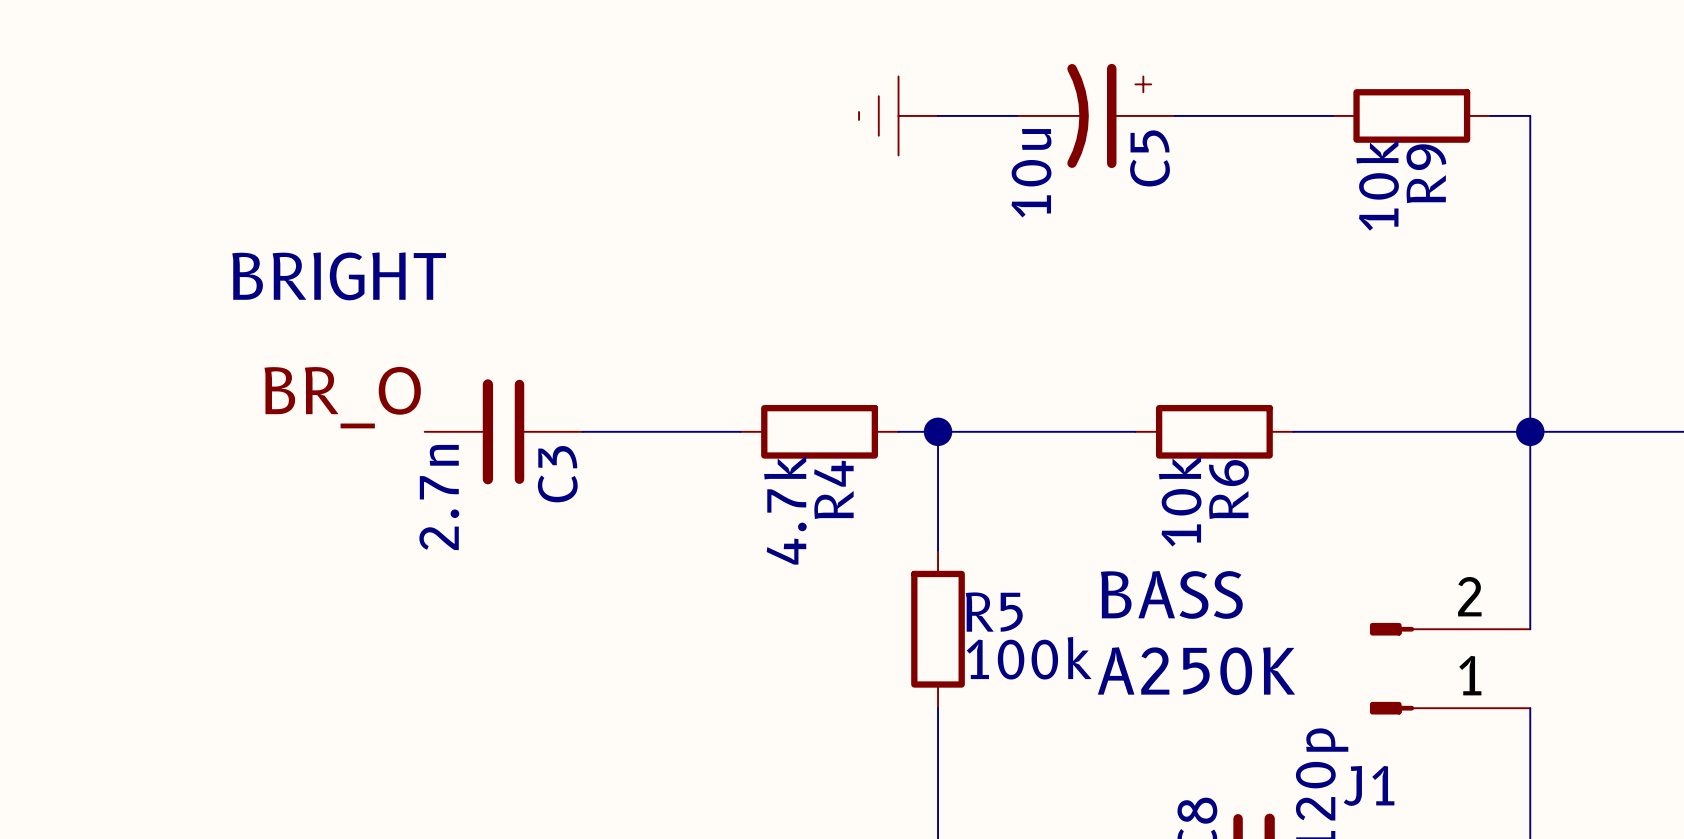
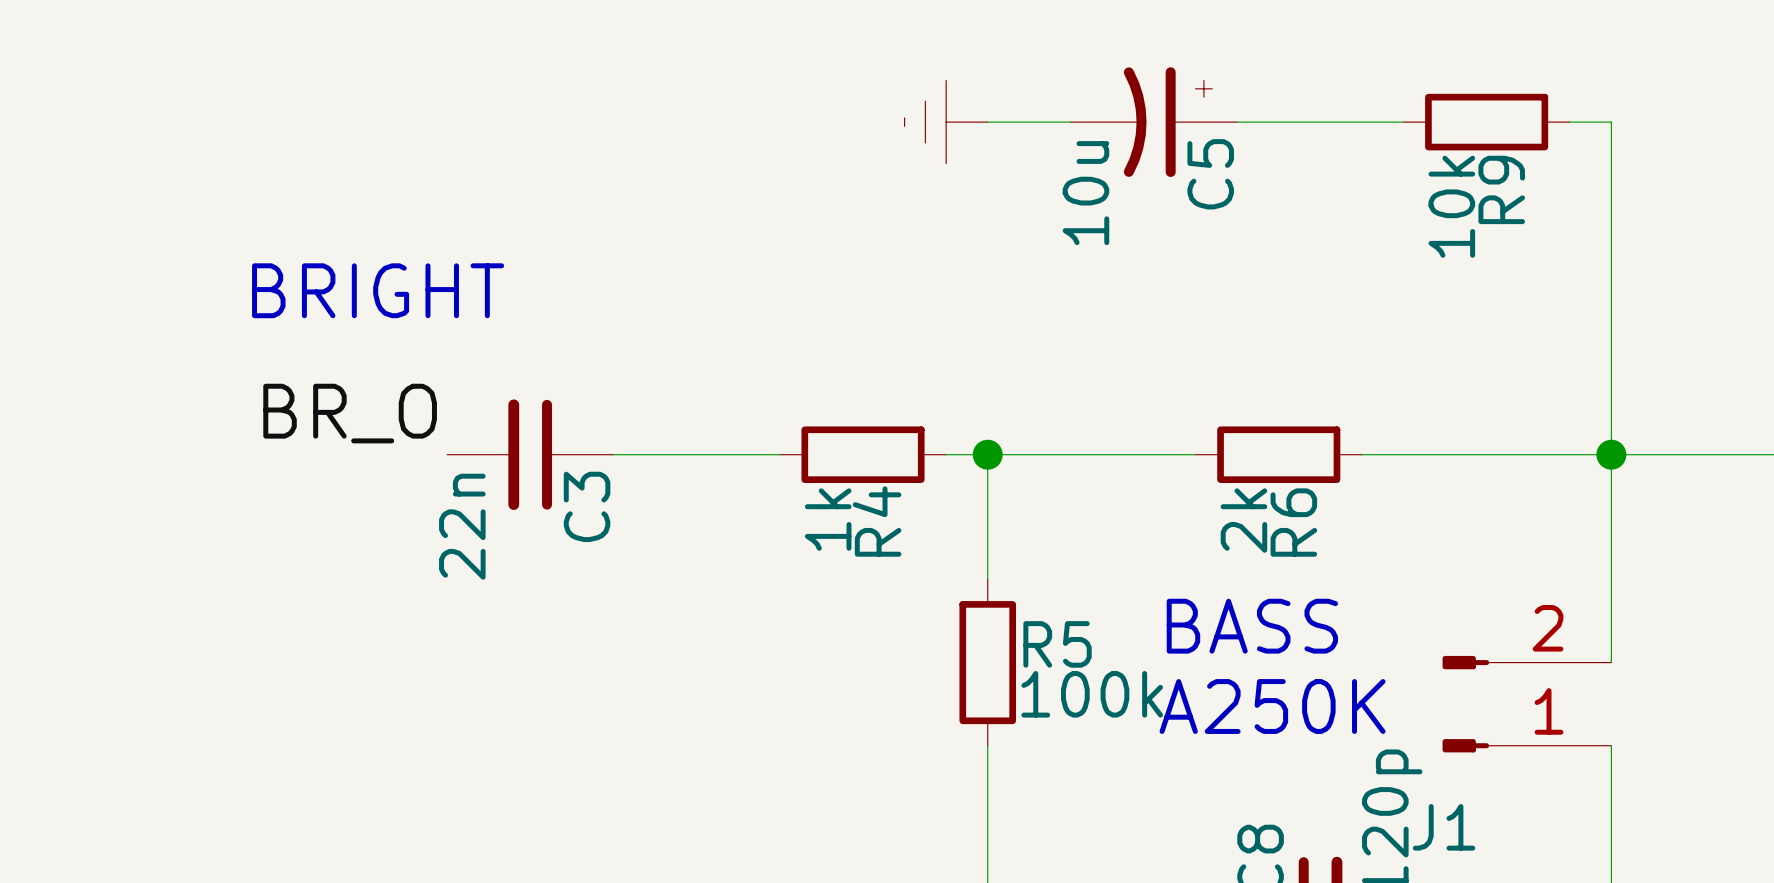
C3 value: 2.7n (439, 497) -> 22n (462, 526)
R6 value: 10k (1180, 501) -> 2k (1243, 520)
R4 value: 4.7k (785, 510) -> 1k (828, 519)

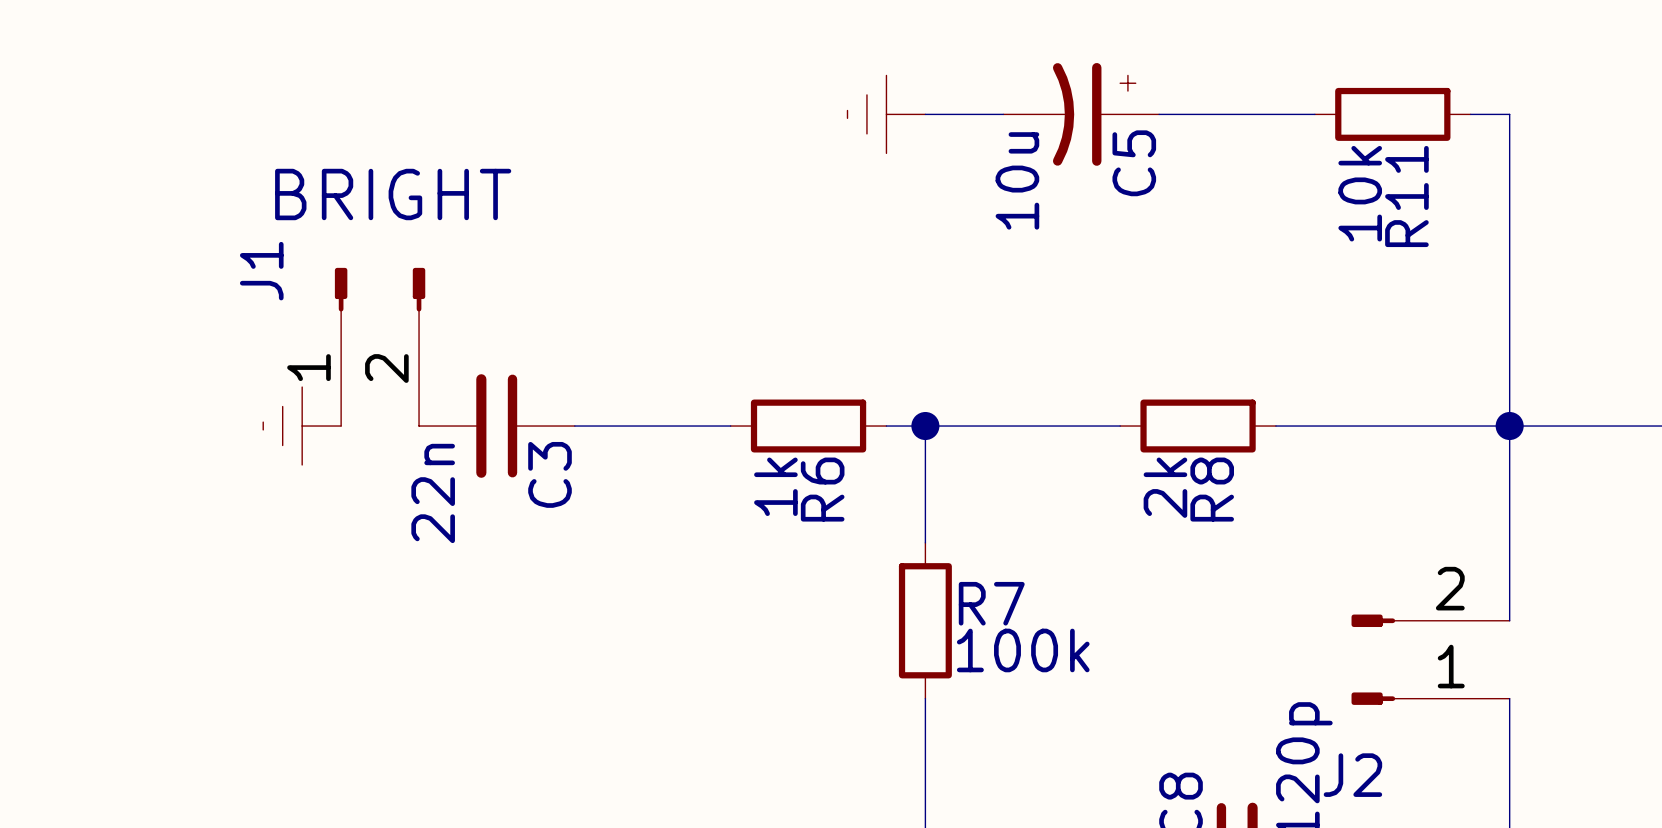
R9 name: R9 (1501, 189) -> R11 (1406, 196)
text position: BRIGHT (378, 290) -> BRIGHT (393, 194)
J1: none -> (380, 346)
label: BR_O (350, 413) -> none
power symbol: none -> (302, 426)
R4 name: R4 (877, 521) -> R6 (822, 489)
R6 name: R6 (1293, 522) -> R8 (1212, 489)
text: BASS (1252, 626) -> none
R5 name: R5 (1057, 644) -> R7 (991, 603)
text: A250K (1272, 706) -> none
J1 name: J1 (1444, 827) -> J2 (1352, 775)

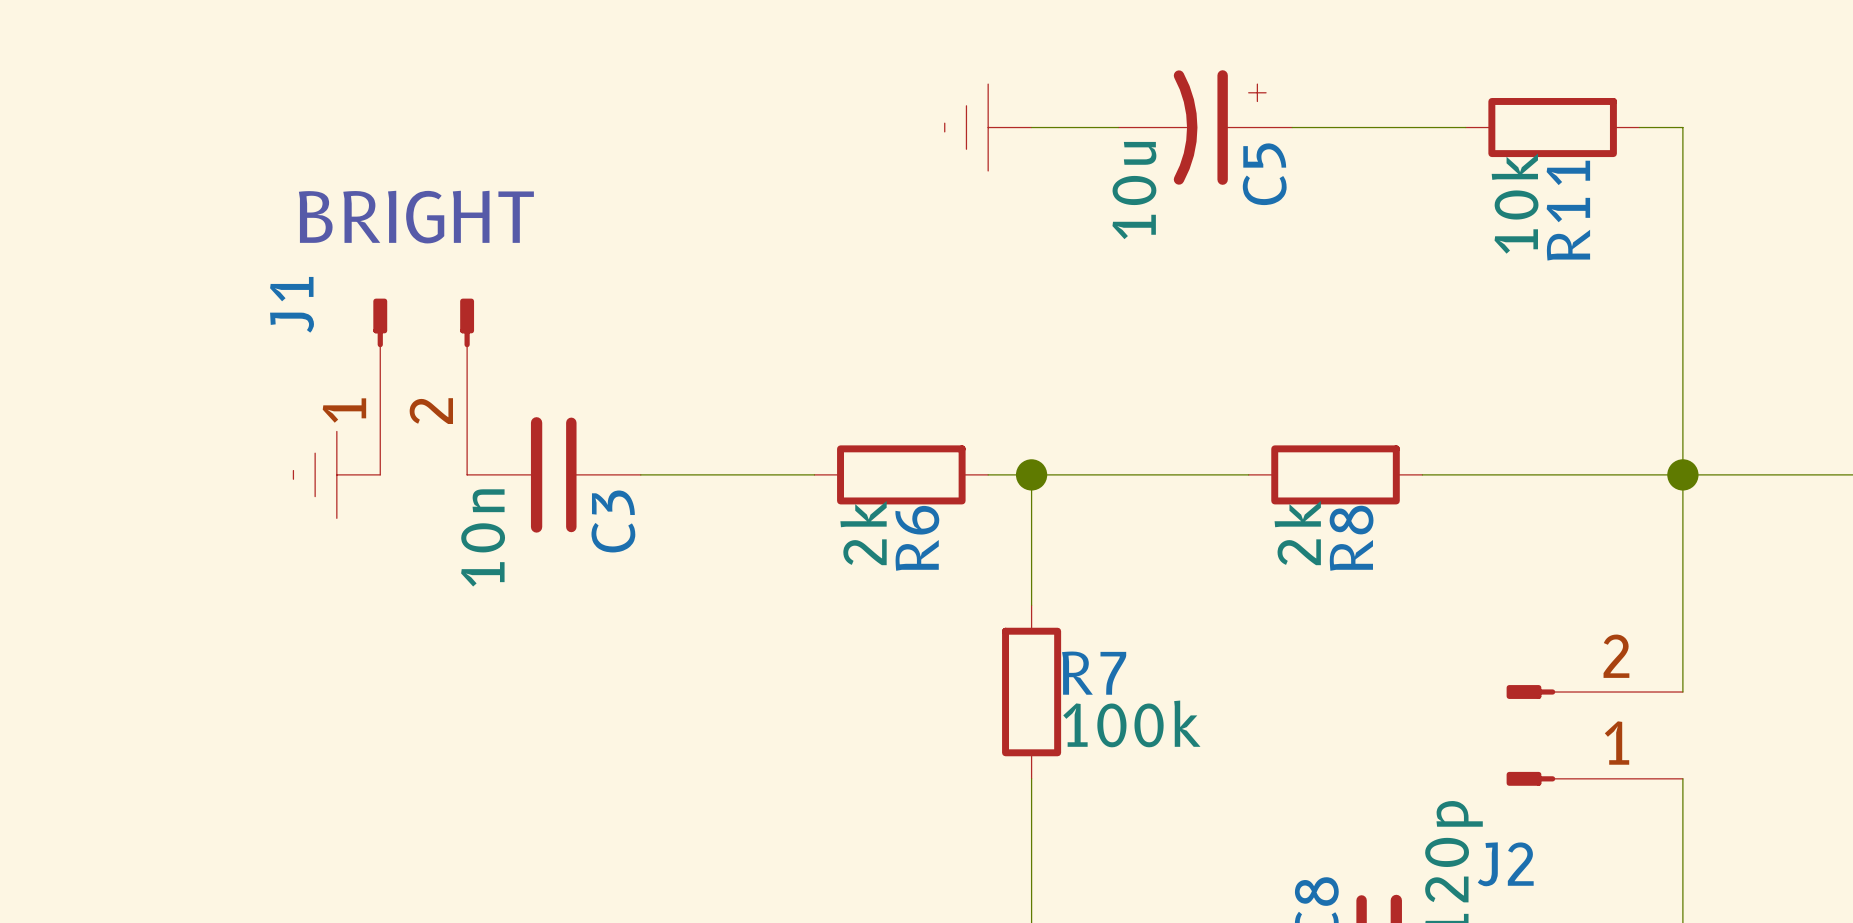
R6 value: 1k (775, 486) -> 2k (863, 533)
C3 value: 22n (433, 493) -> 10n (483, 537)

